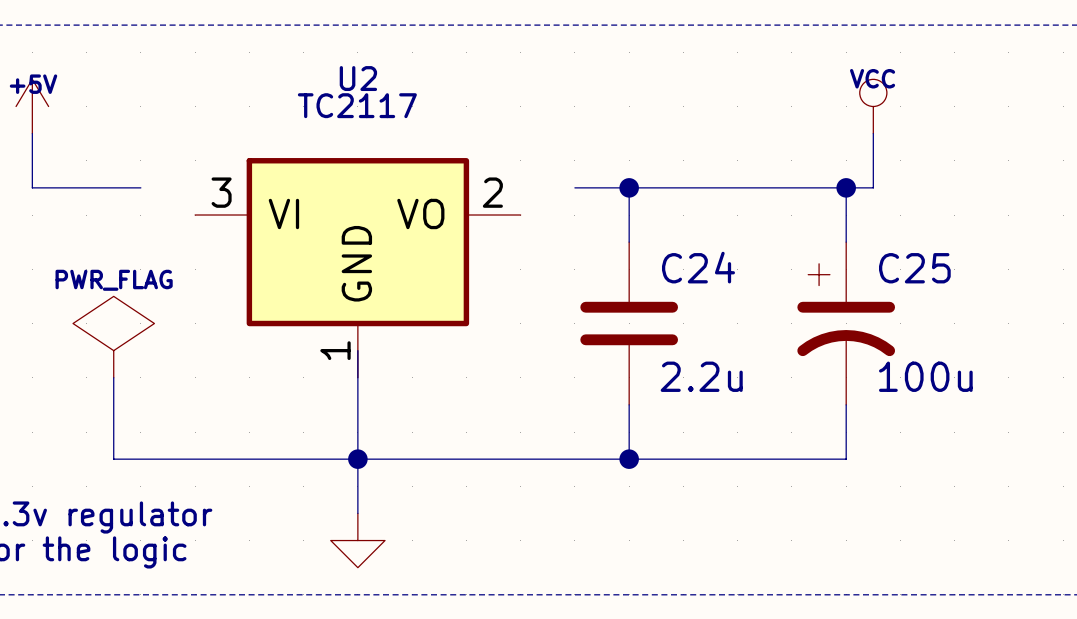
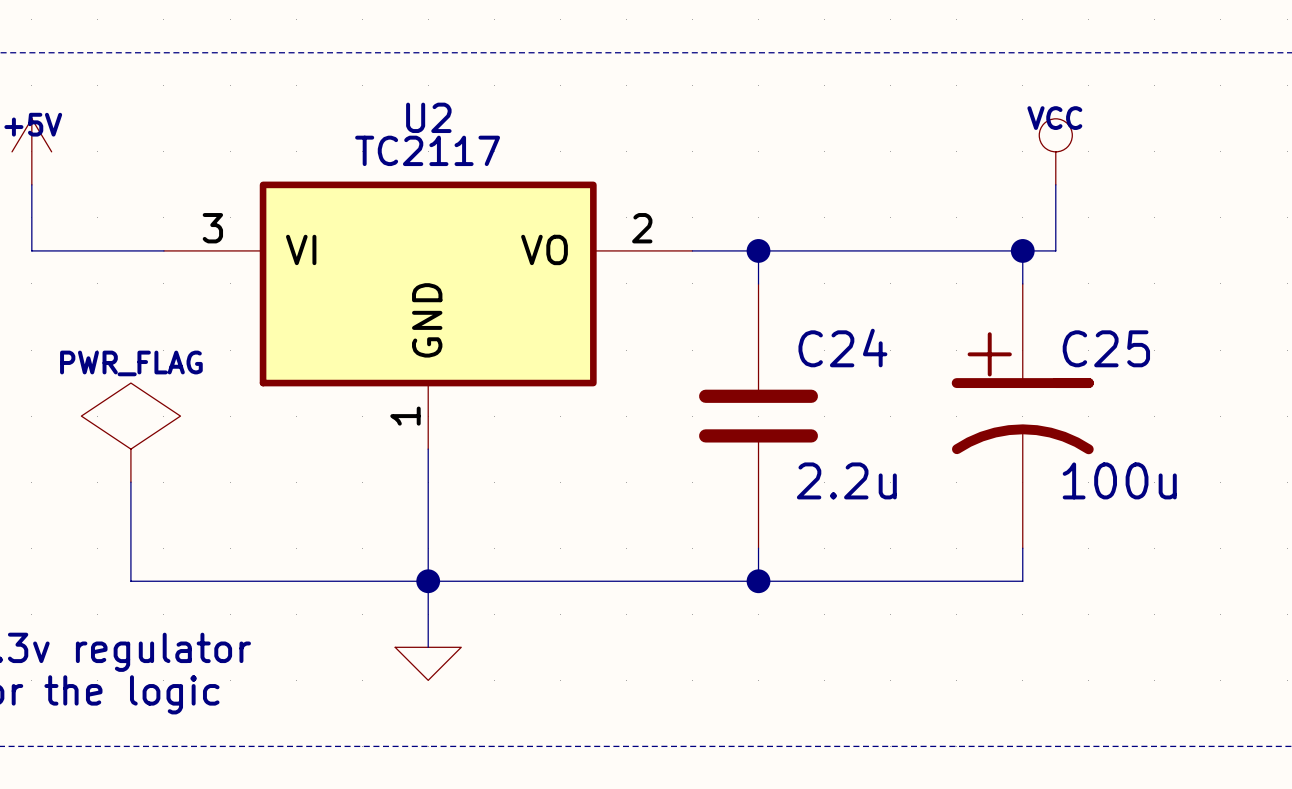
U2 symbol: [195, 158, 521, 378] -> [163, 181, 693, 450]
C24 symbol: [580, 242, 679, 405] -> [699, 283, 818, 549]
C25 symbol: [797, 242, 896, 405] -> [951, 283, 1094, 549]
power symbol shape: [330, 513, 386, 568] -> [395, 647, 462, 681]

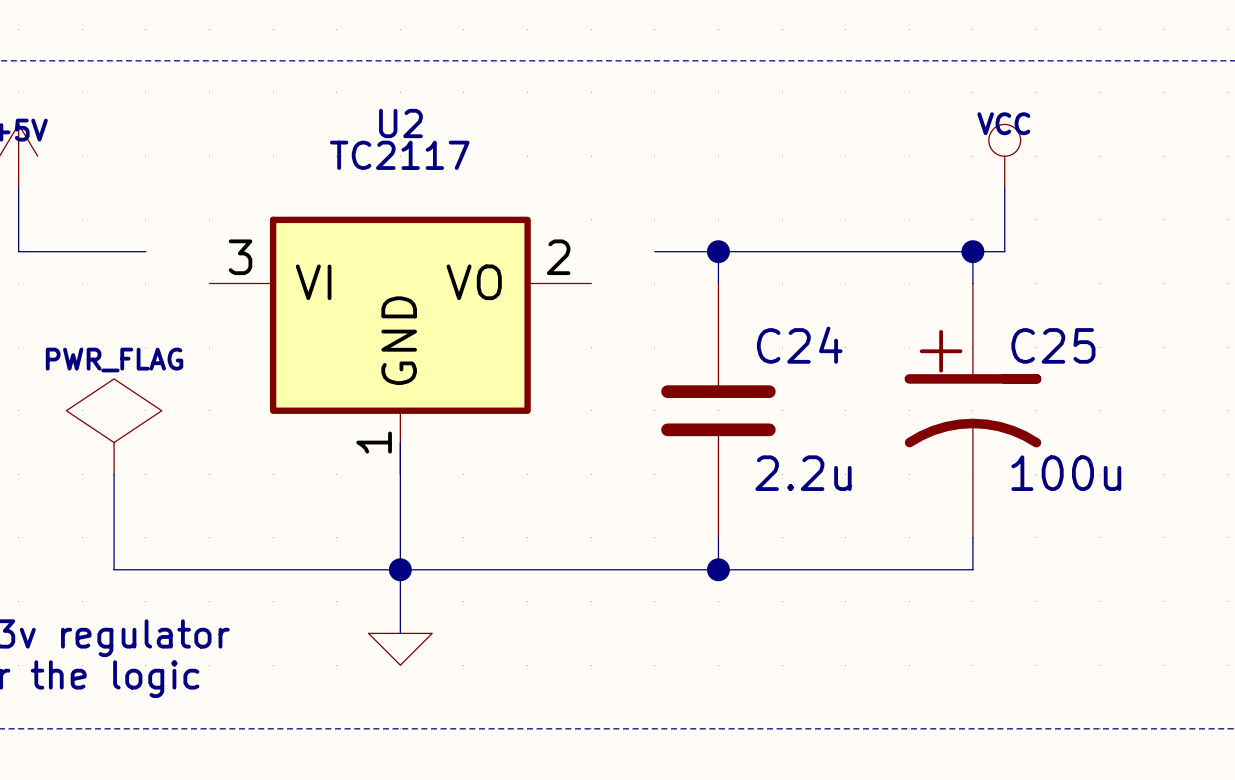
U2 symbol: [163, 181, 693, 450] -> [209, 216, 592, 475]

